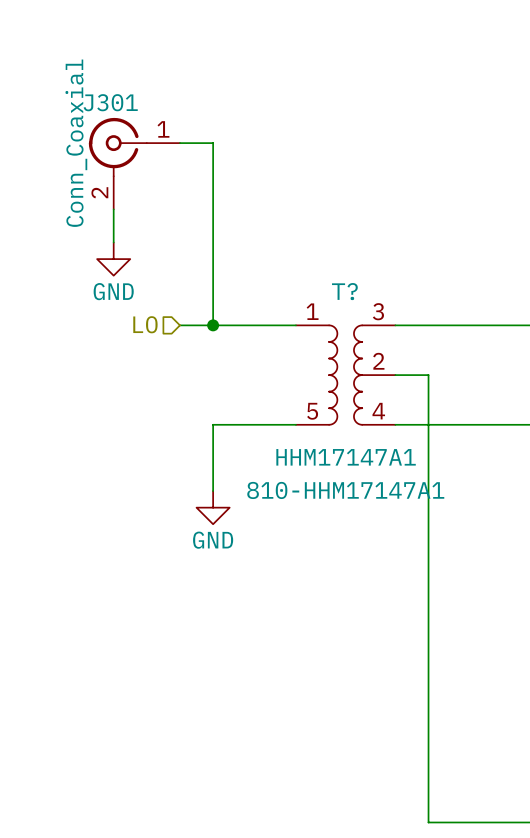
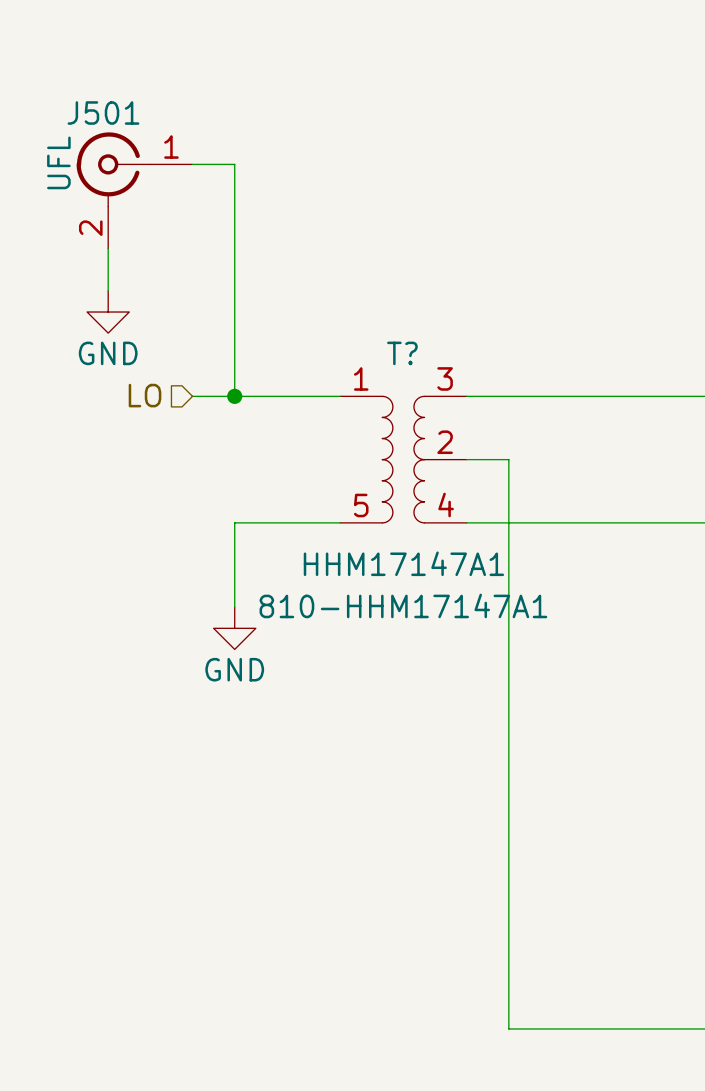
J301 name: J301 (110, 102) -> J501 (103, 113)
J301 value: Conn_Coaxial (76, 143) -> UFL (58, 162)

